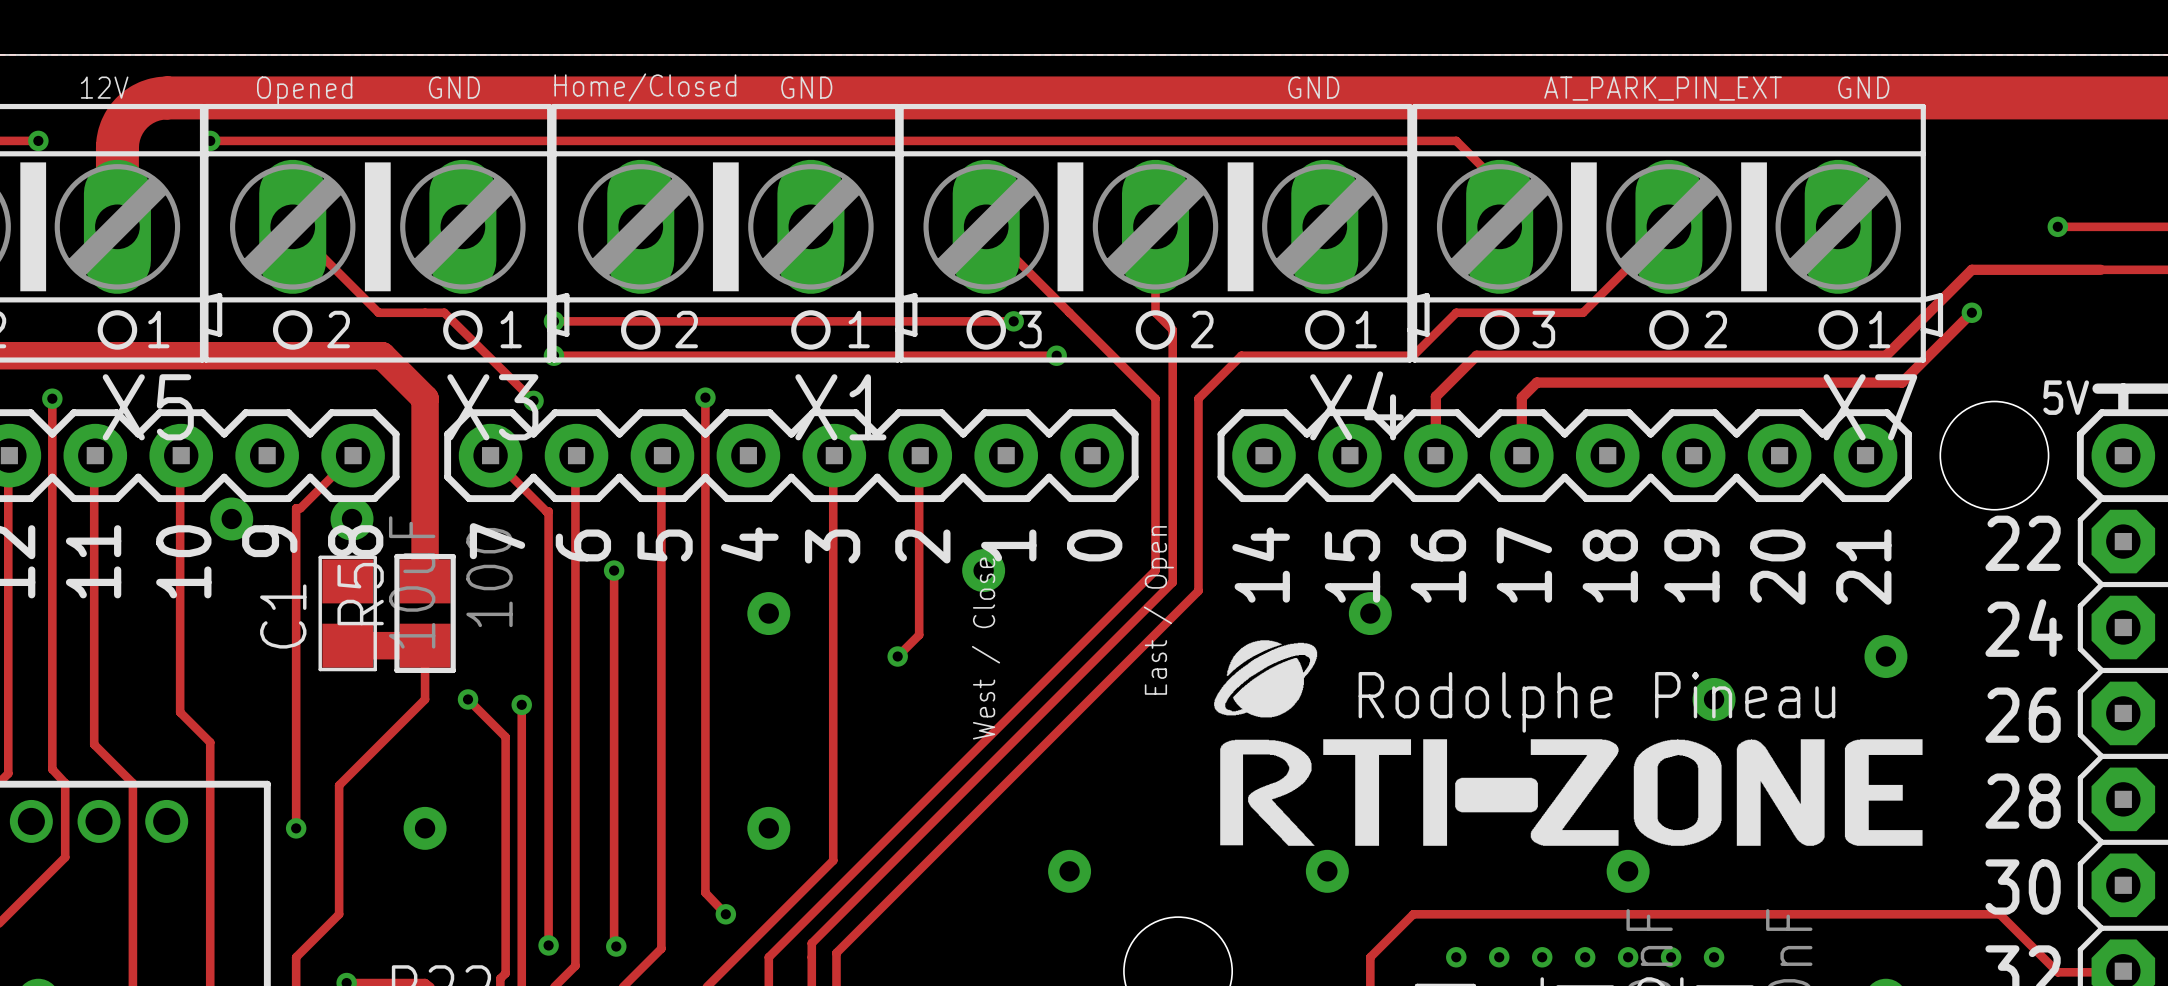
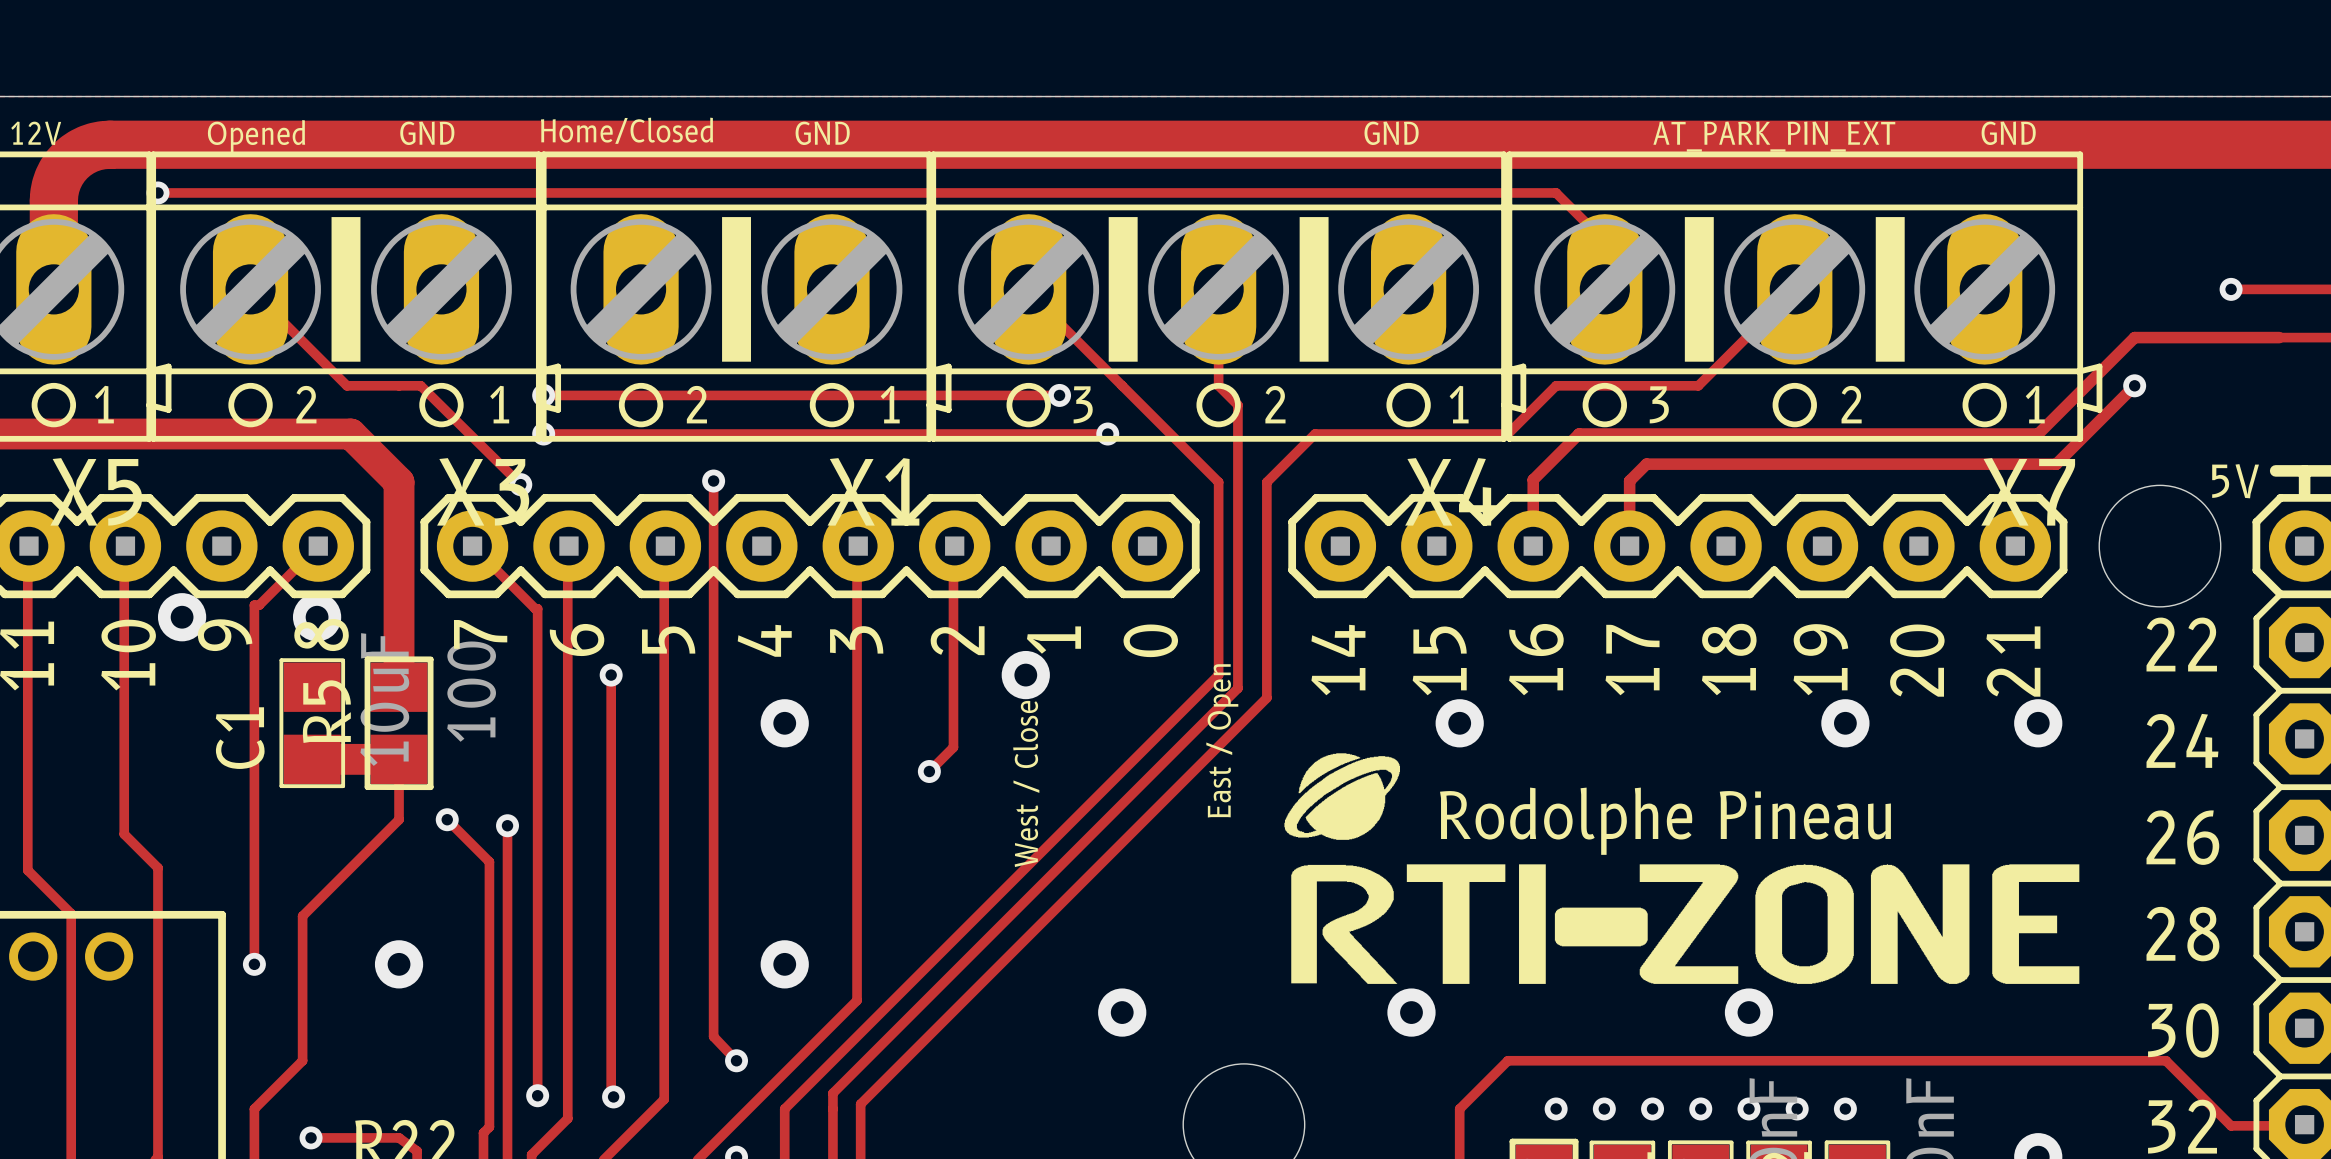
via position: (1885, 656) -> (2038, 723)
via position: (1714, 699) -> (1845, 723)

